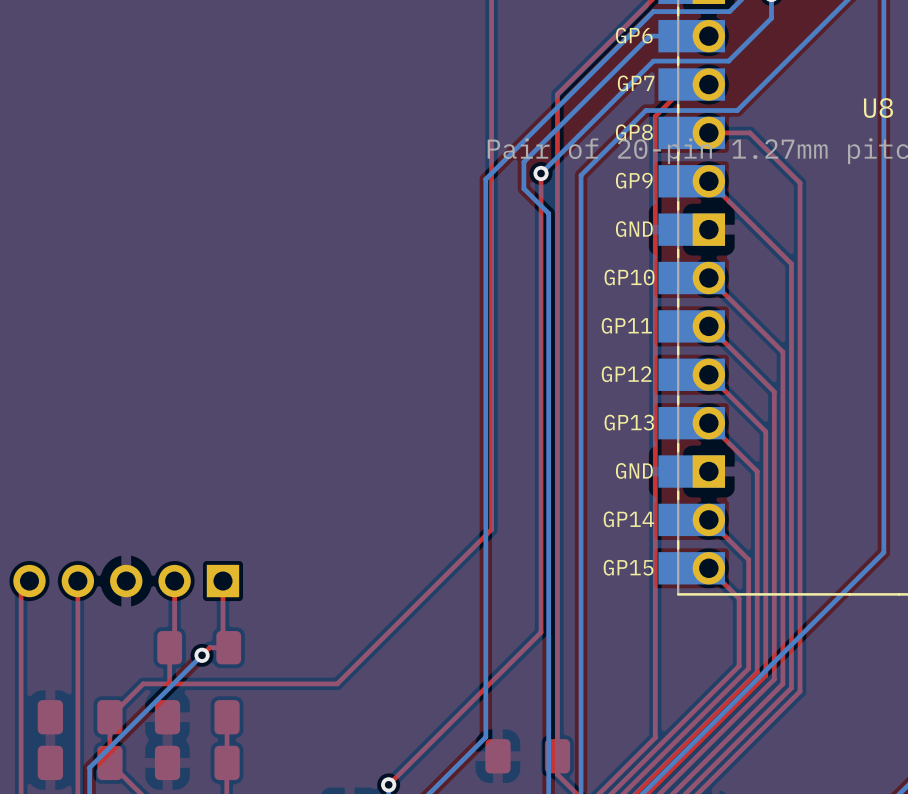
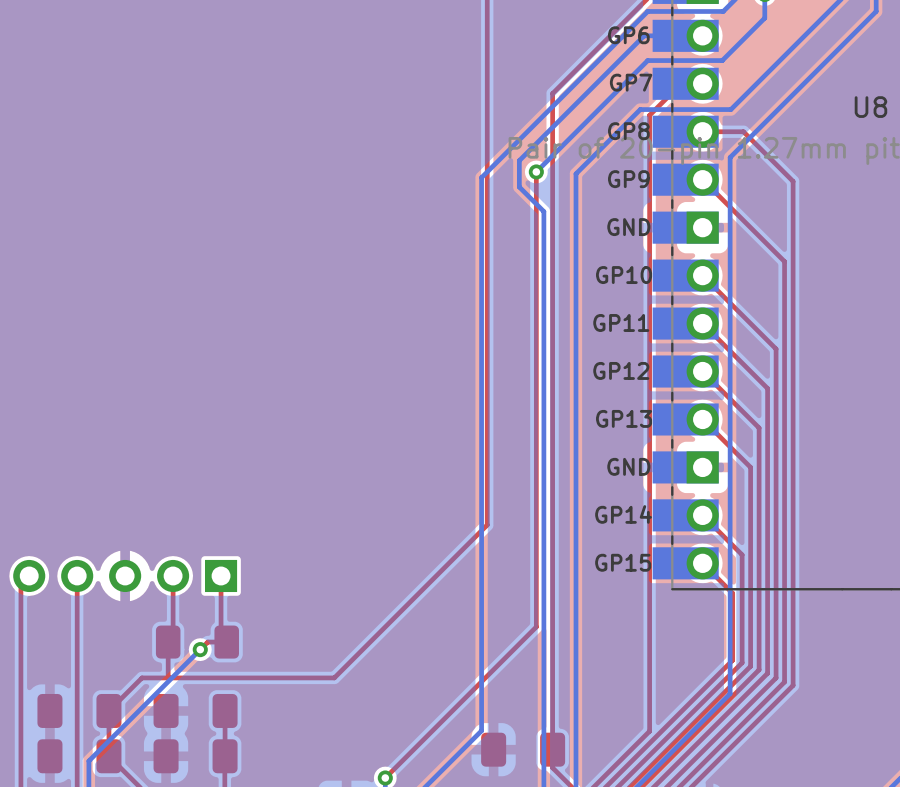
bottom track: (883, 11) (883, 552) (736, 699) -> (876, 11) (730, 157) (730, 693)

